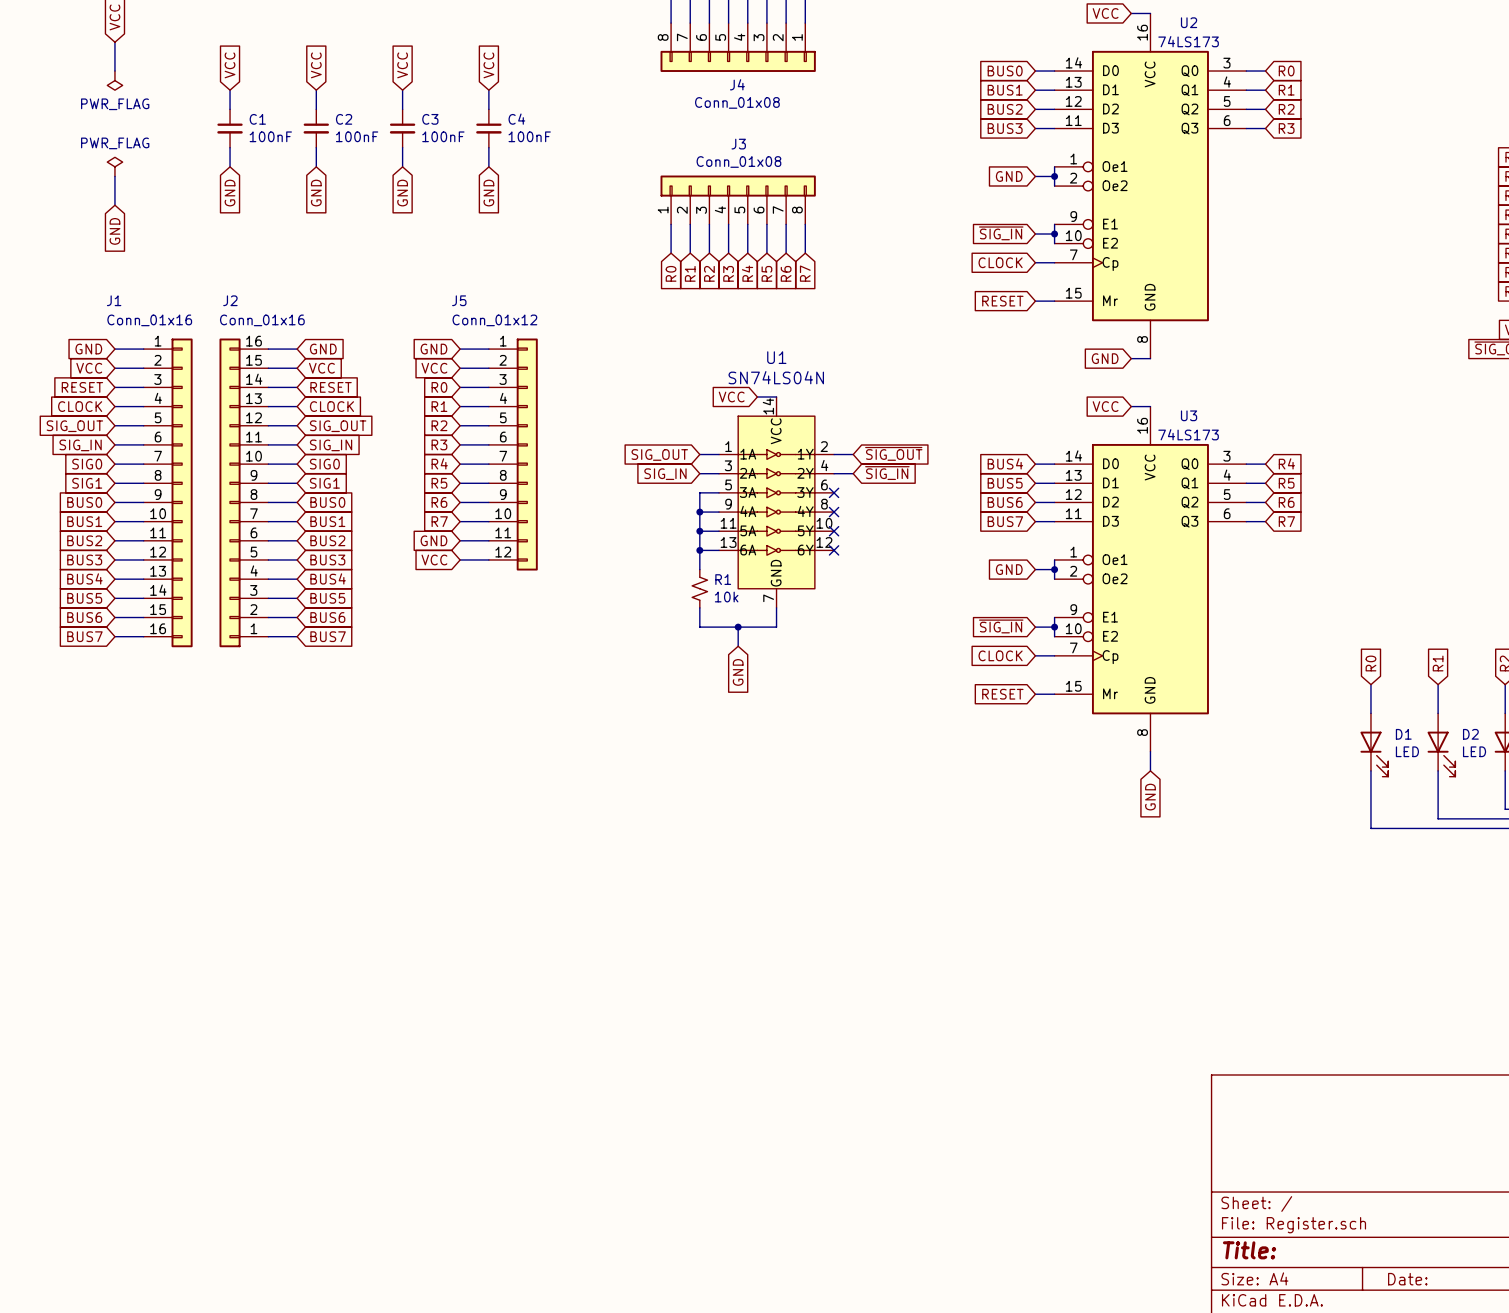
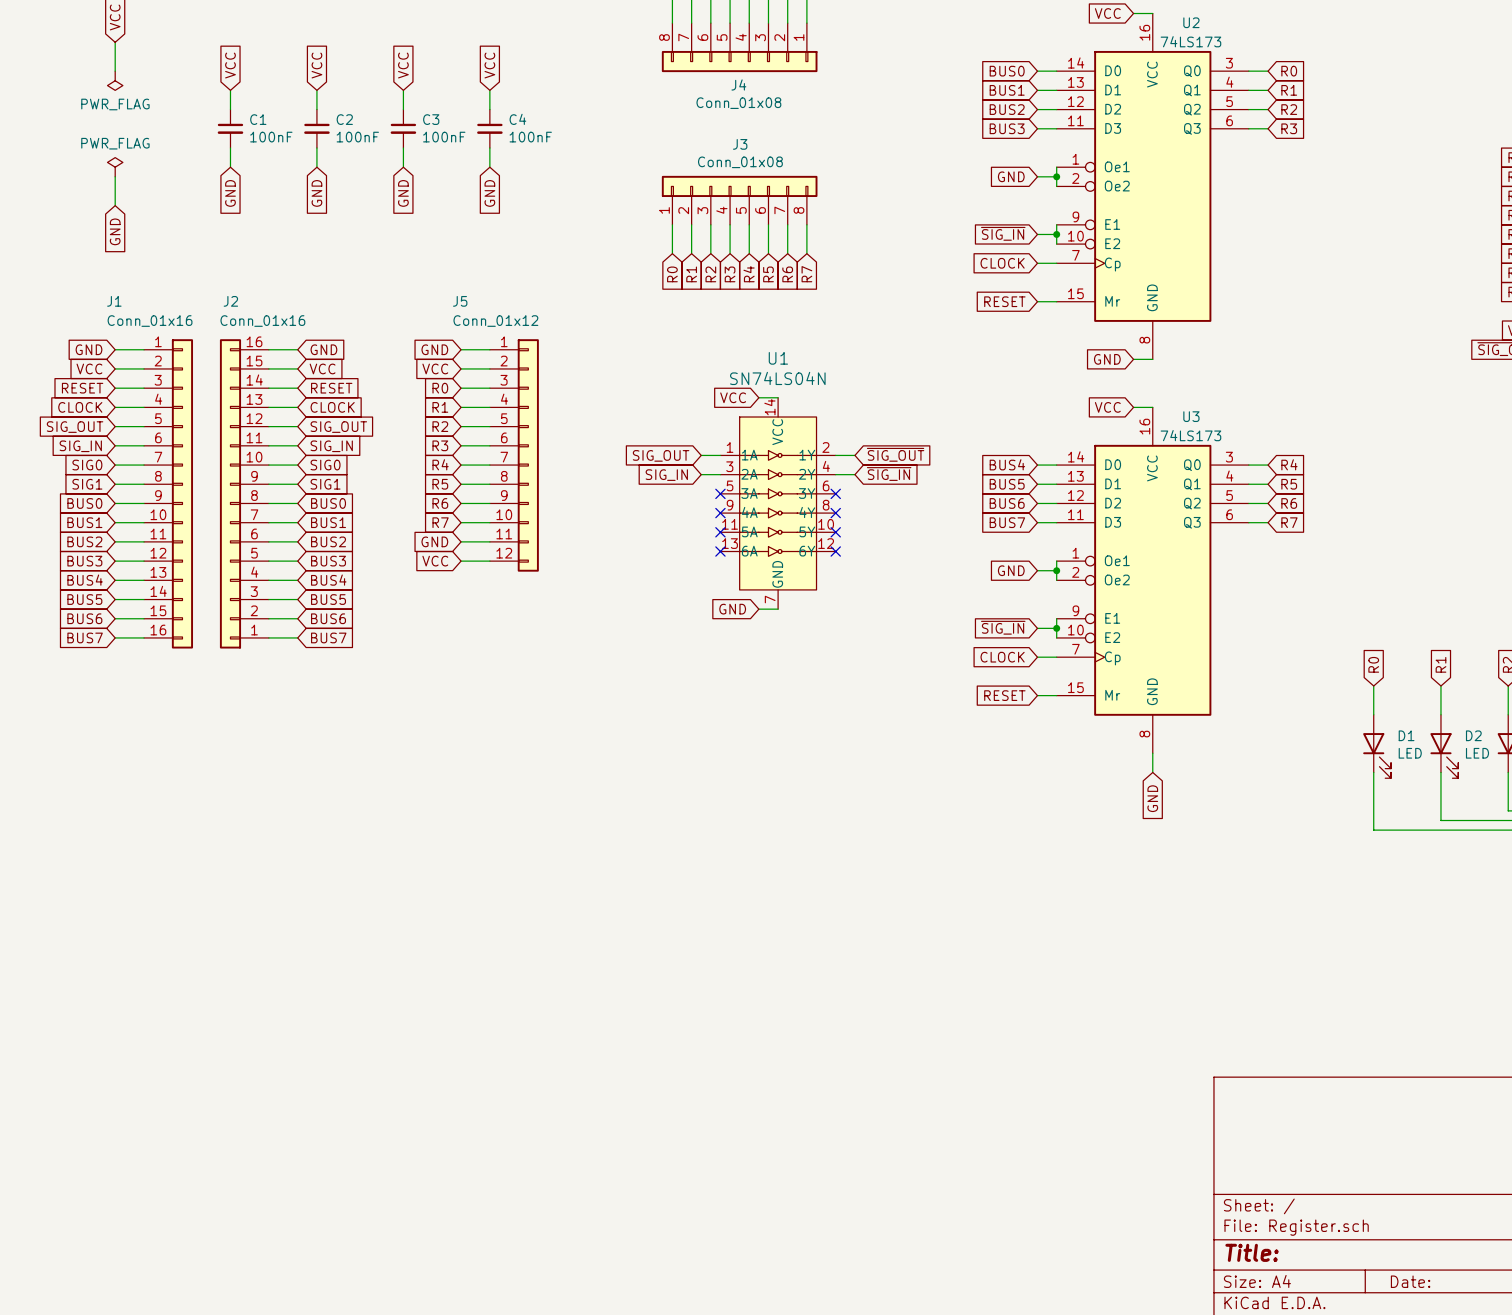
wire: (719, 492) (699, 492) (699, 569) -> none
no-connect mark: none -> (720, 493)
wire: (699, 512) (719, 512) -> none
junction: (699, 512) -> none
no-connect mark: none -> (720, 513)
wire: (699, 531) (719, 531) -> none
junction: (699, 531) -> none
no-connect mark: none -> (720, 532)
wire: (699, 550) (719, 550) -> none
junction: (699, 550) -> none
no-connect mark: none -> (720, 551)
R1: 10k (699, 588) -> none
wire: (699, 607) (699, 627) (776, 627) (776, 607) -> (758, 609) (778, 609)
wire: (738, 627) (738, 646) -> none
junction: (738, 627) -> none
global label rotation: 0° (738, 672) -> 90° clockwise (732, 609)
global label position: GND (738, 672) -> GND (732, 609)

